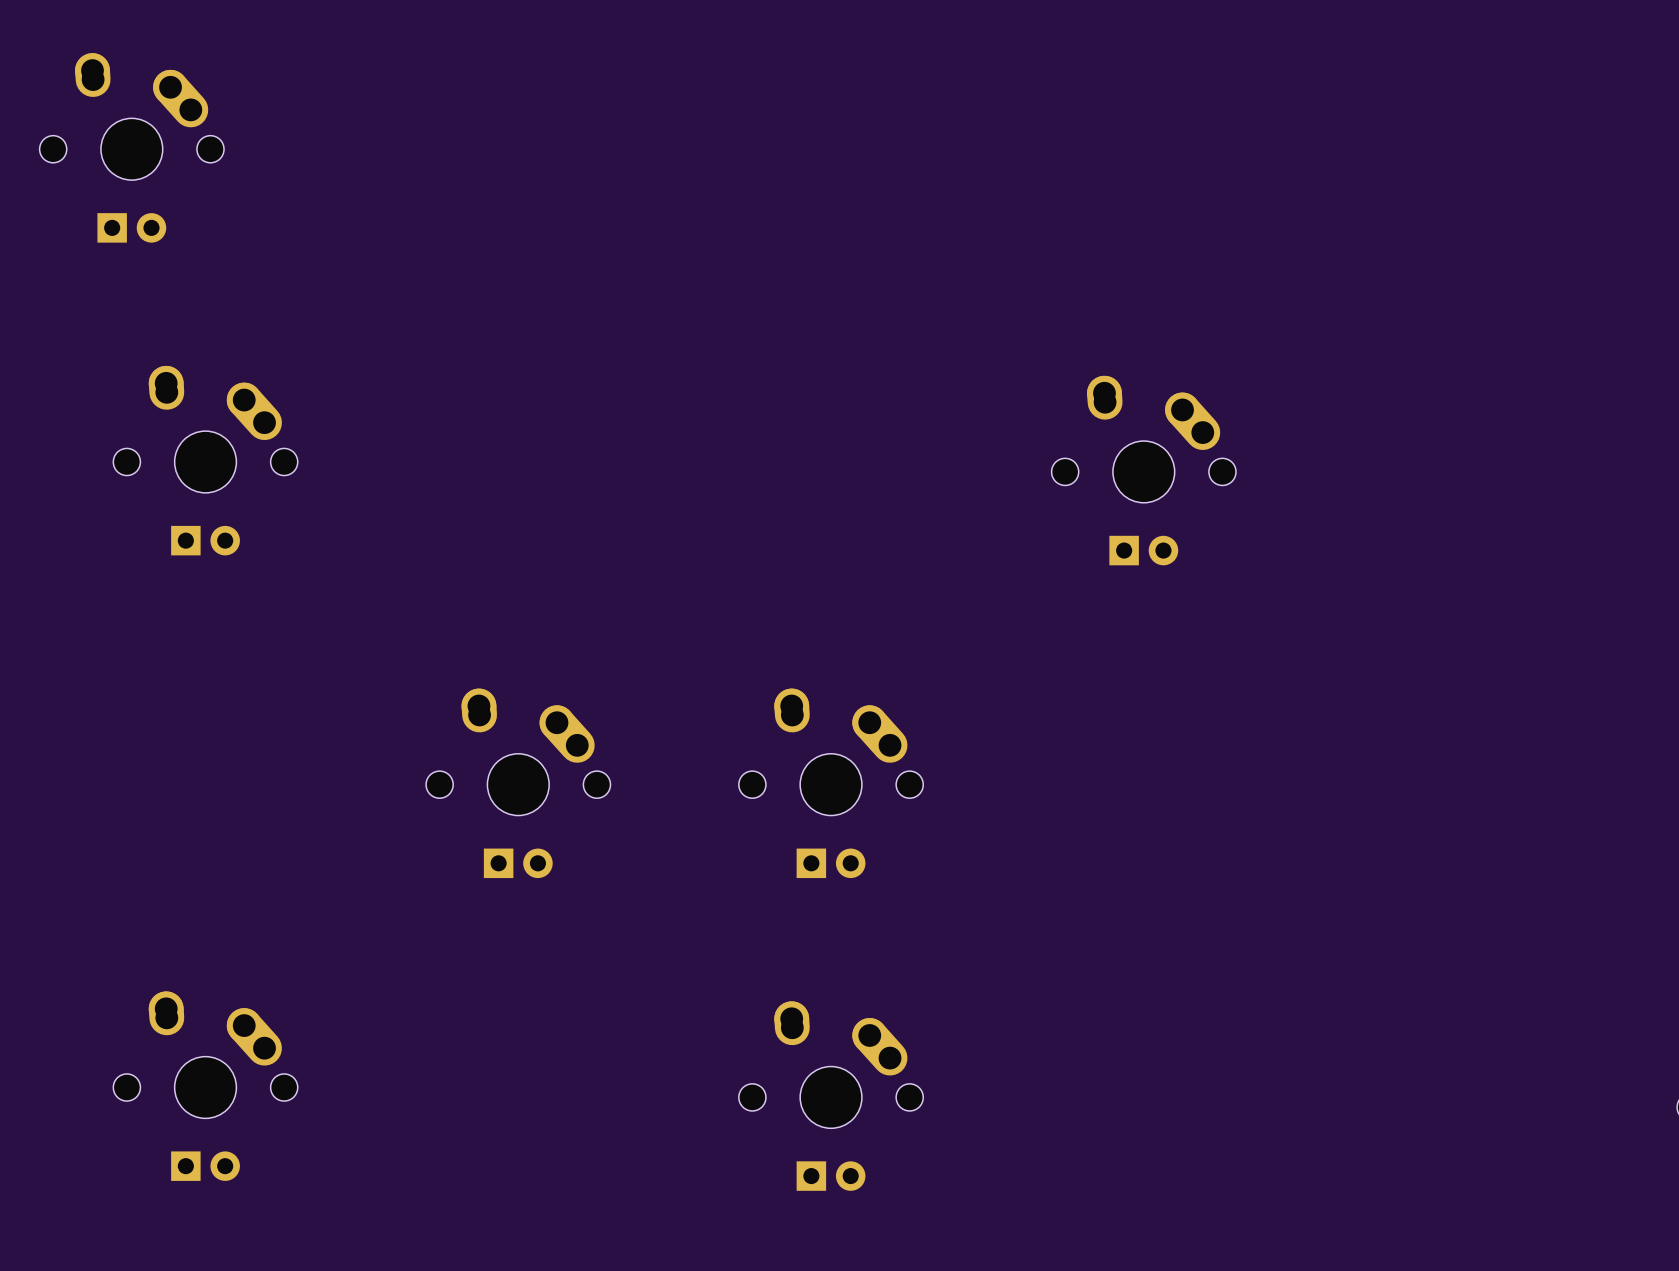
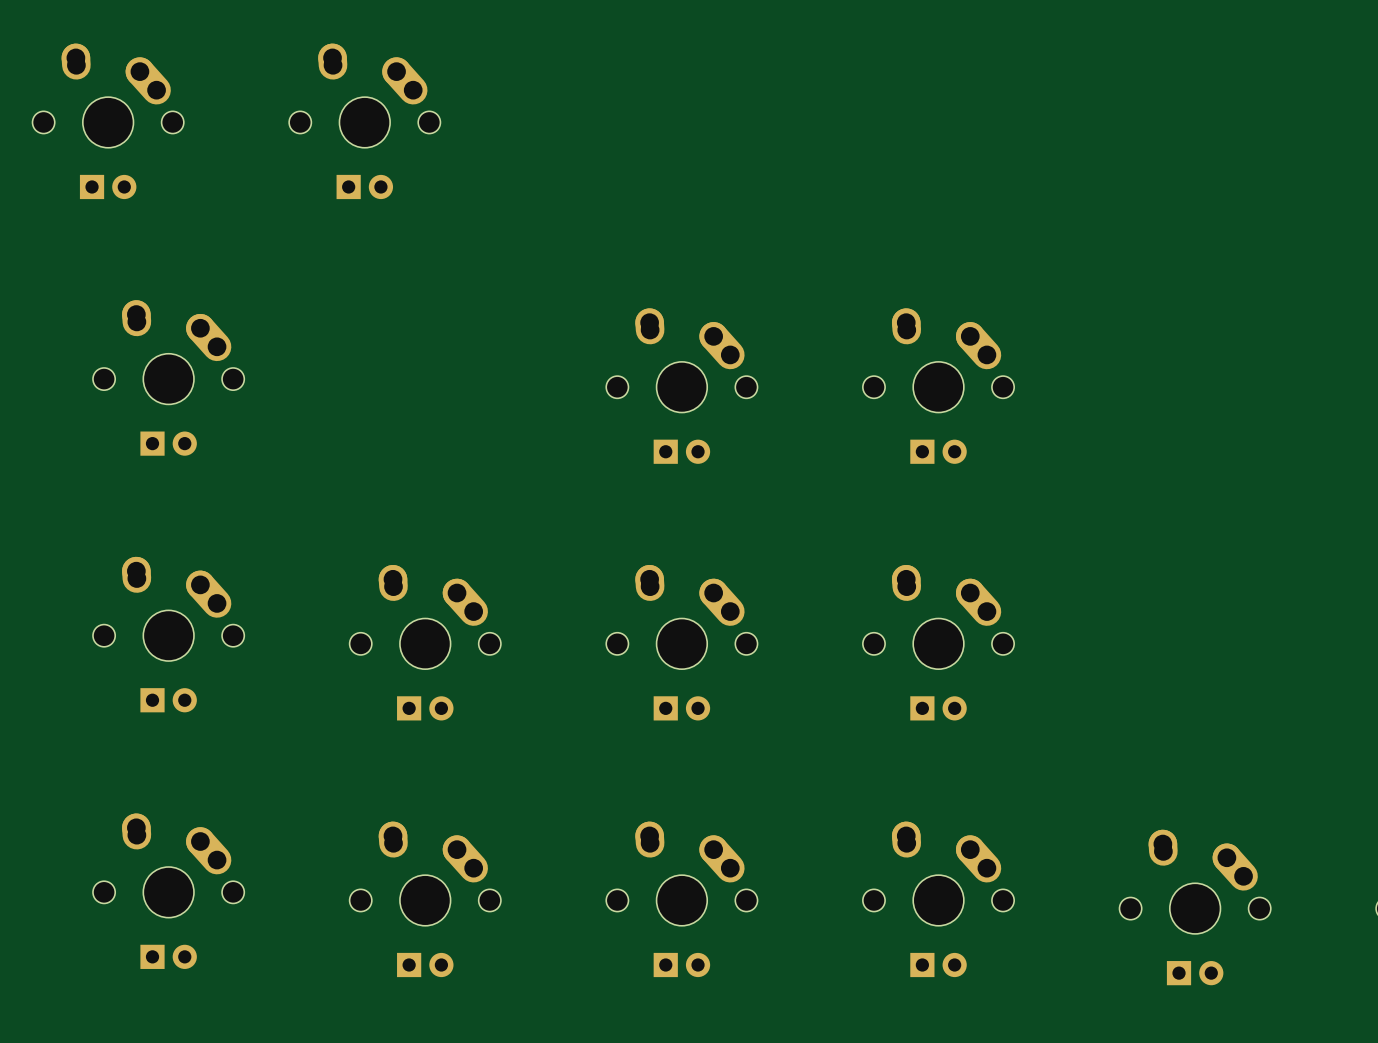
part: none -> (364, 121)
part: none -> (681, 386)
part: none -> (168, 634)
part: none -> (938, 642)
part: none -> (425, 899)
part: none -> (938, 899)
part: none -> (1195, 907)

